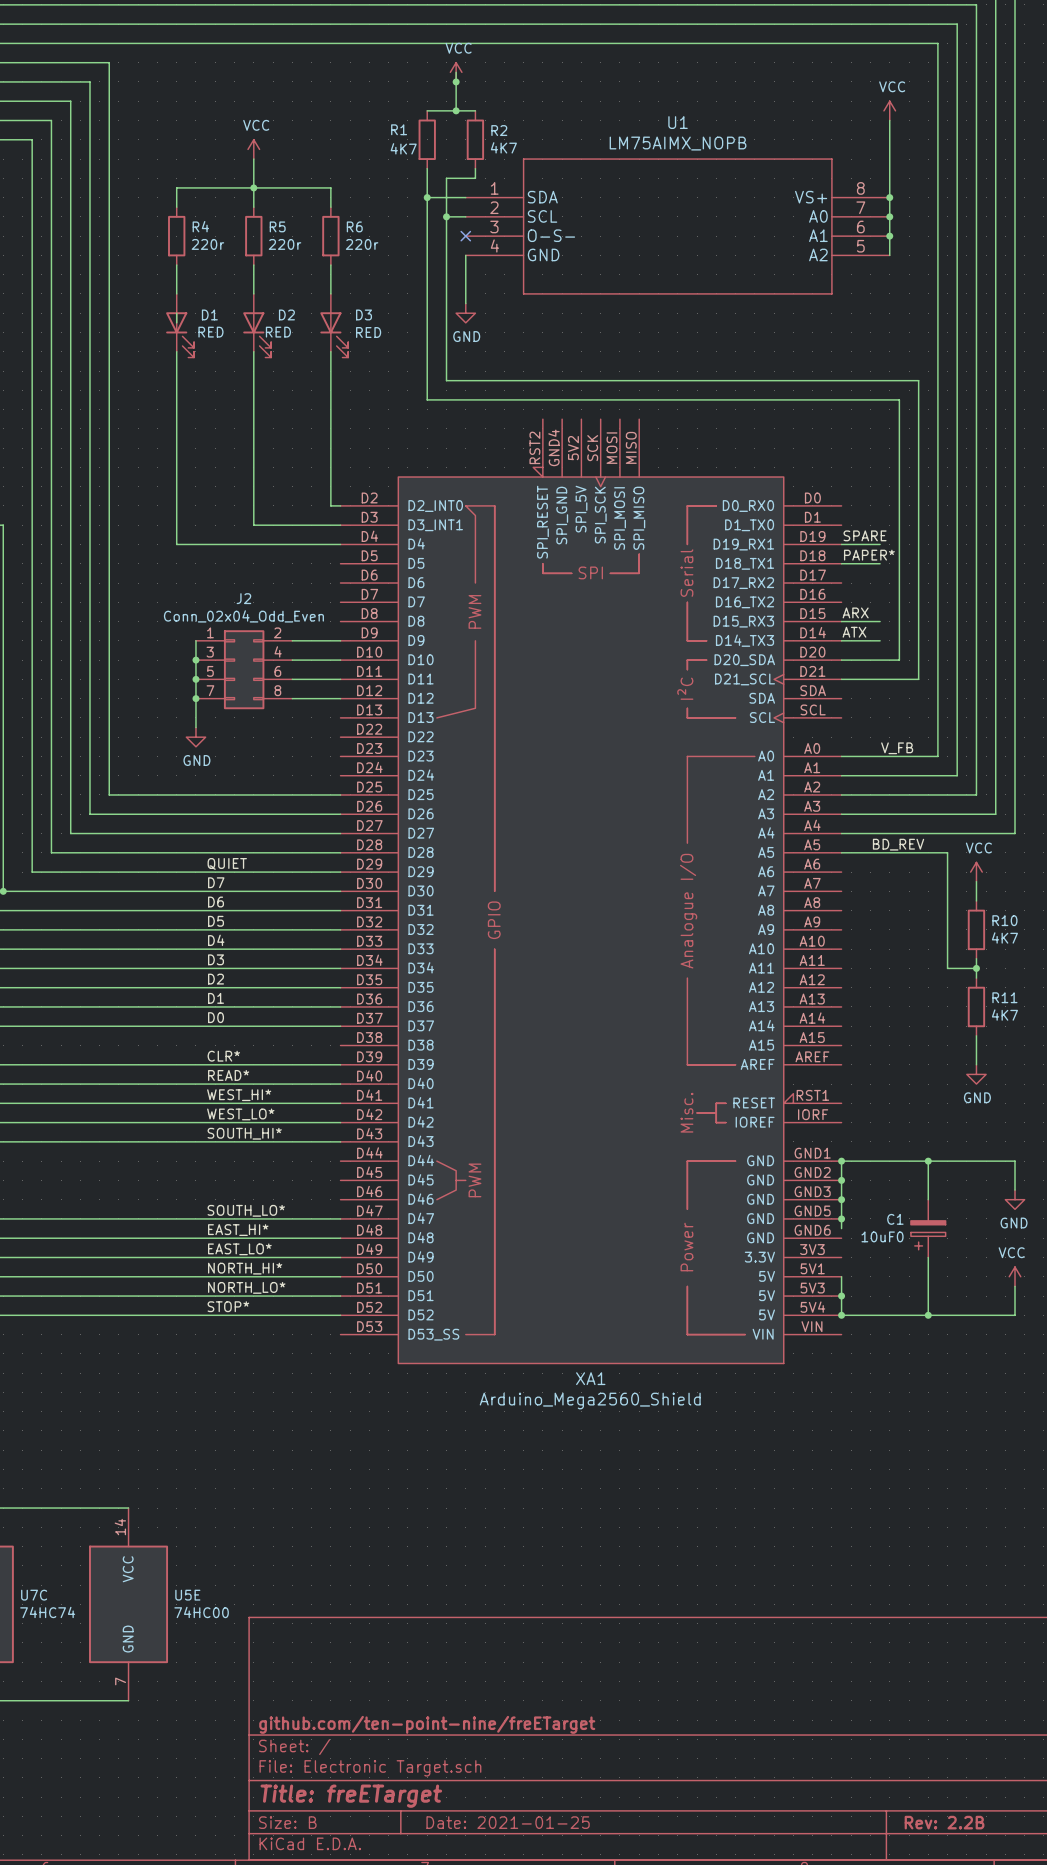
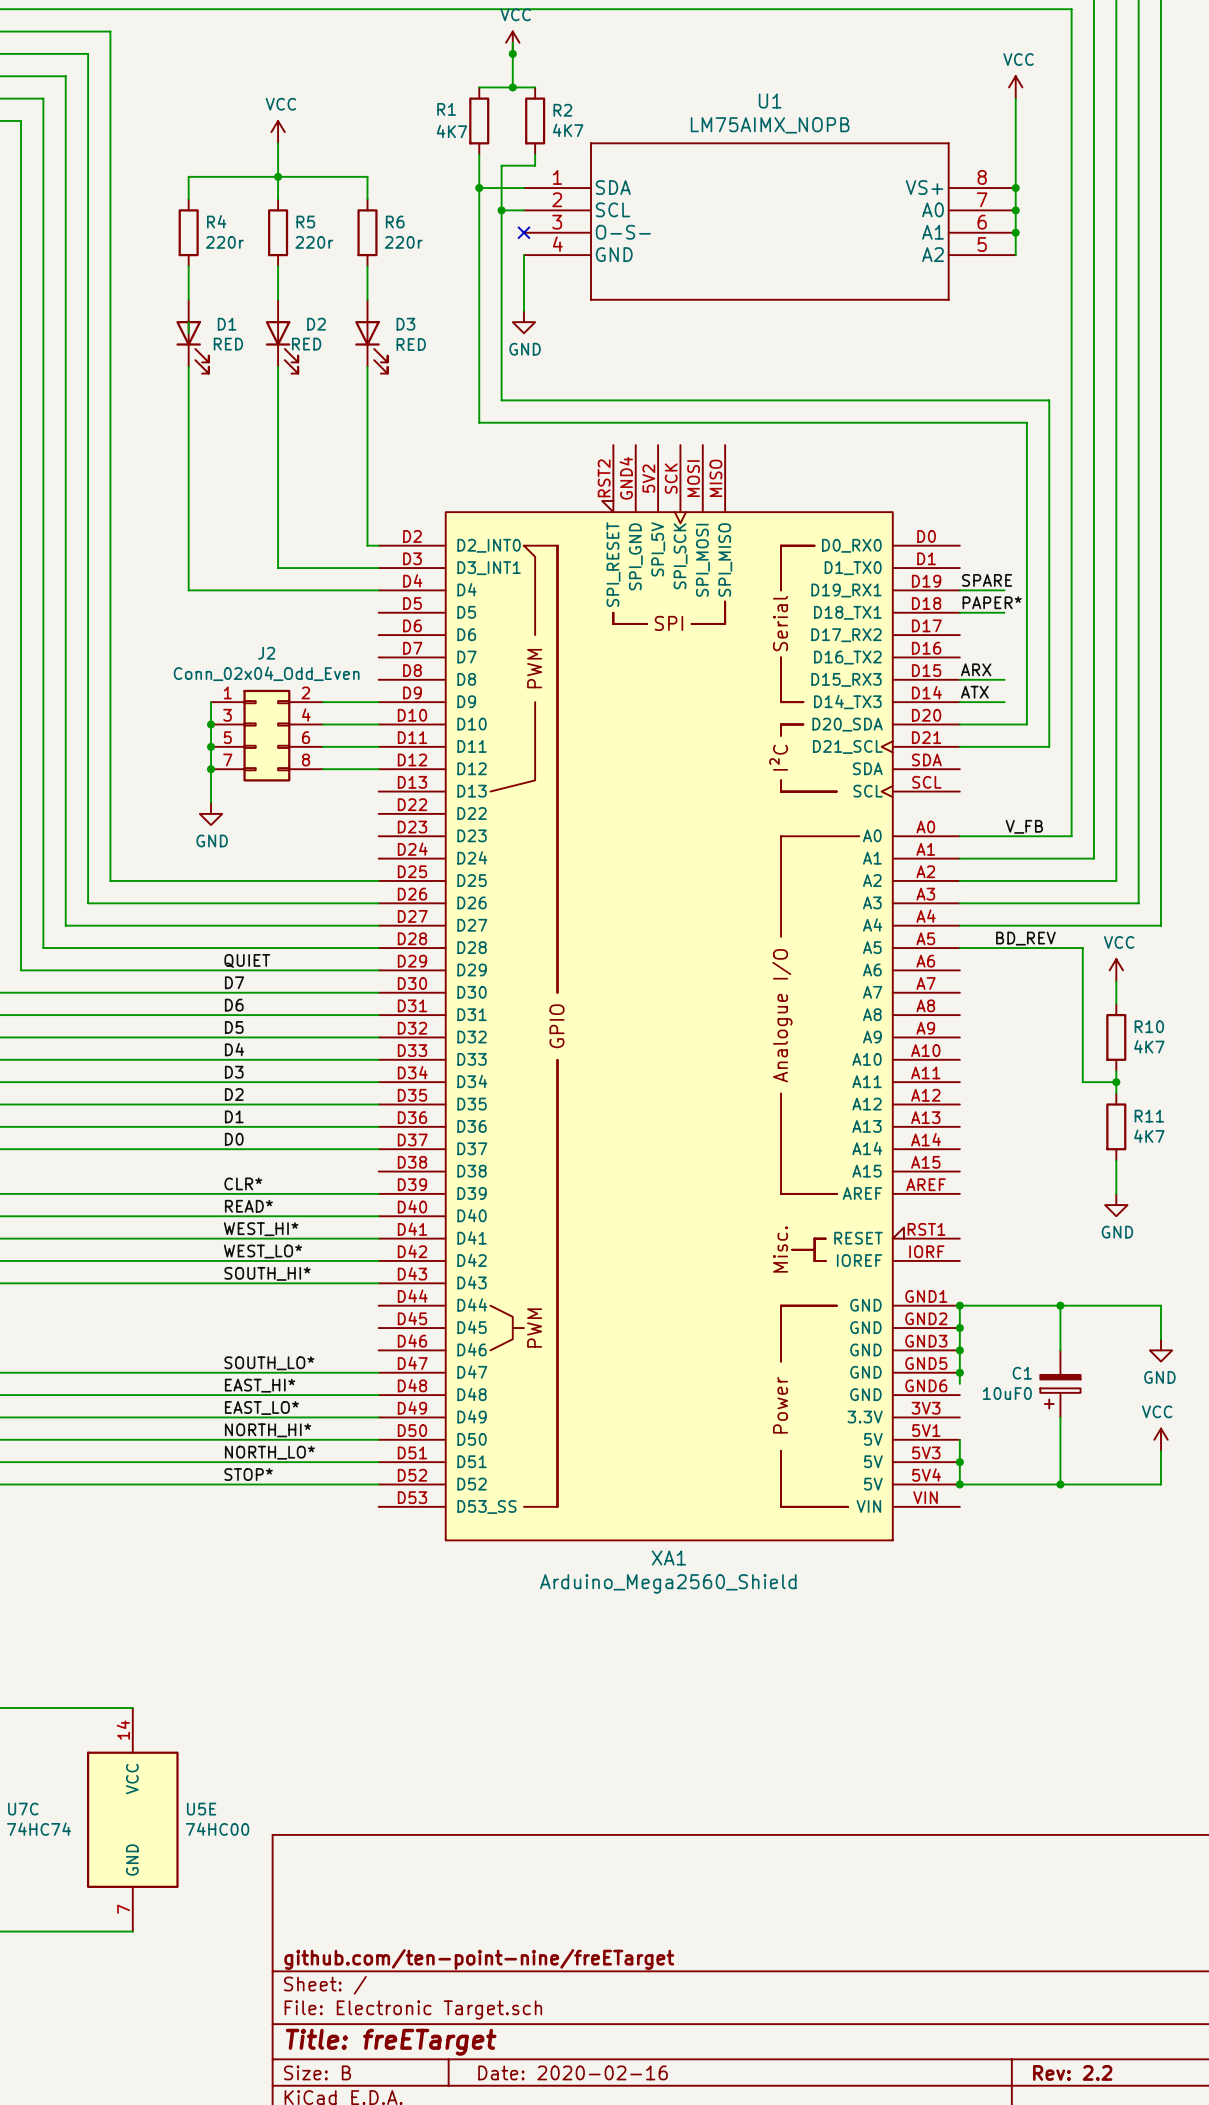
title block: Date: 2021-01-25 (508, 1822) -> Date: 2020-02-16 (573, 2072)
title block: Rev: 2.2B (944, 1822) -> Rev: 2.2 (1072, 2072)

